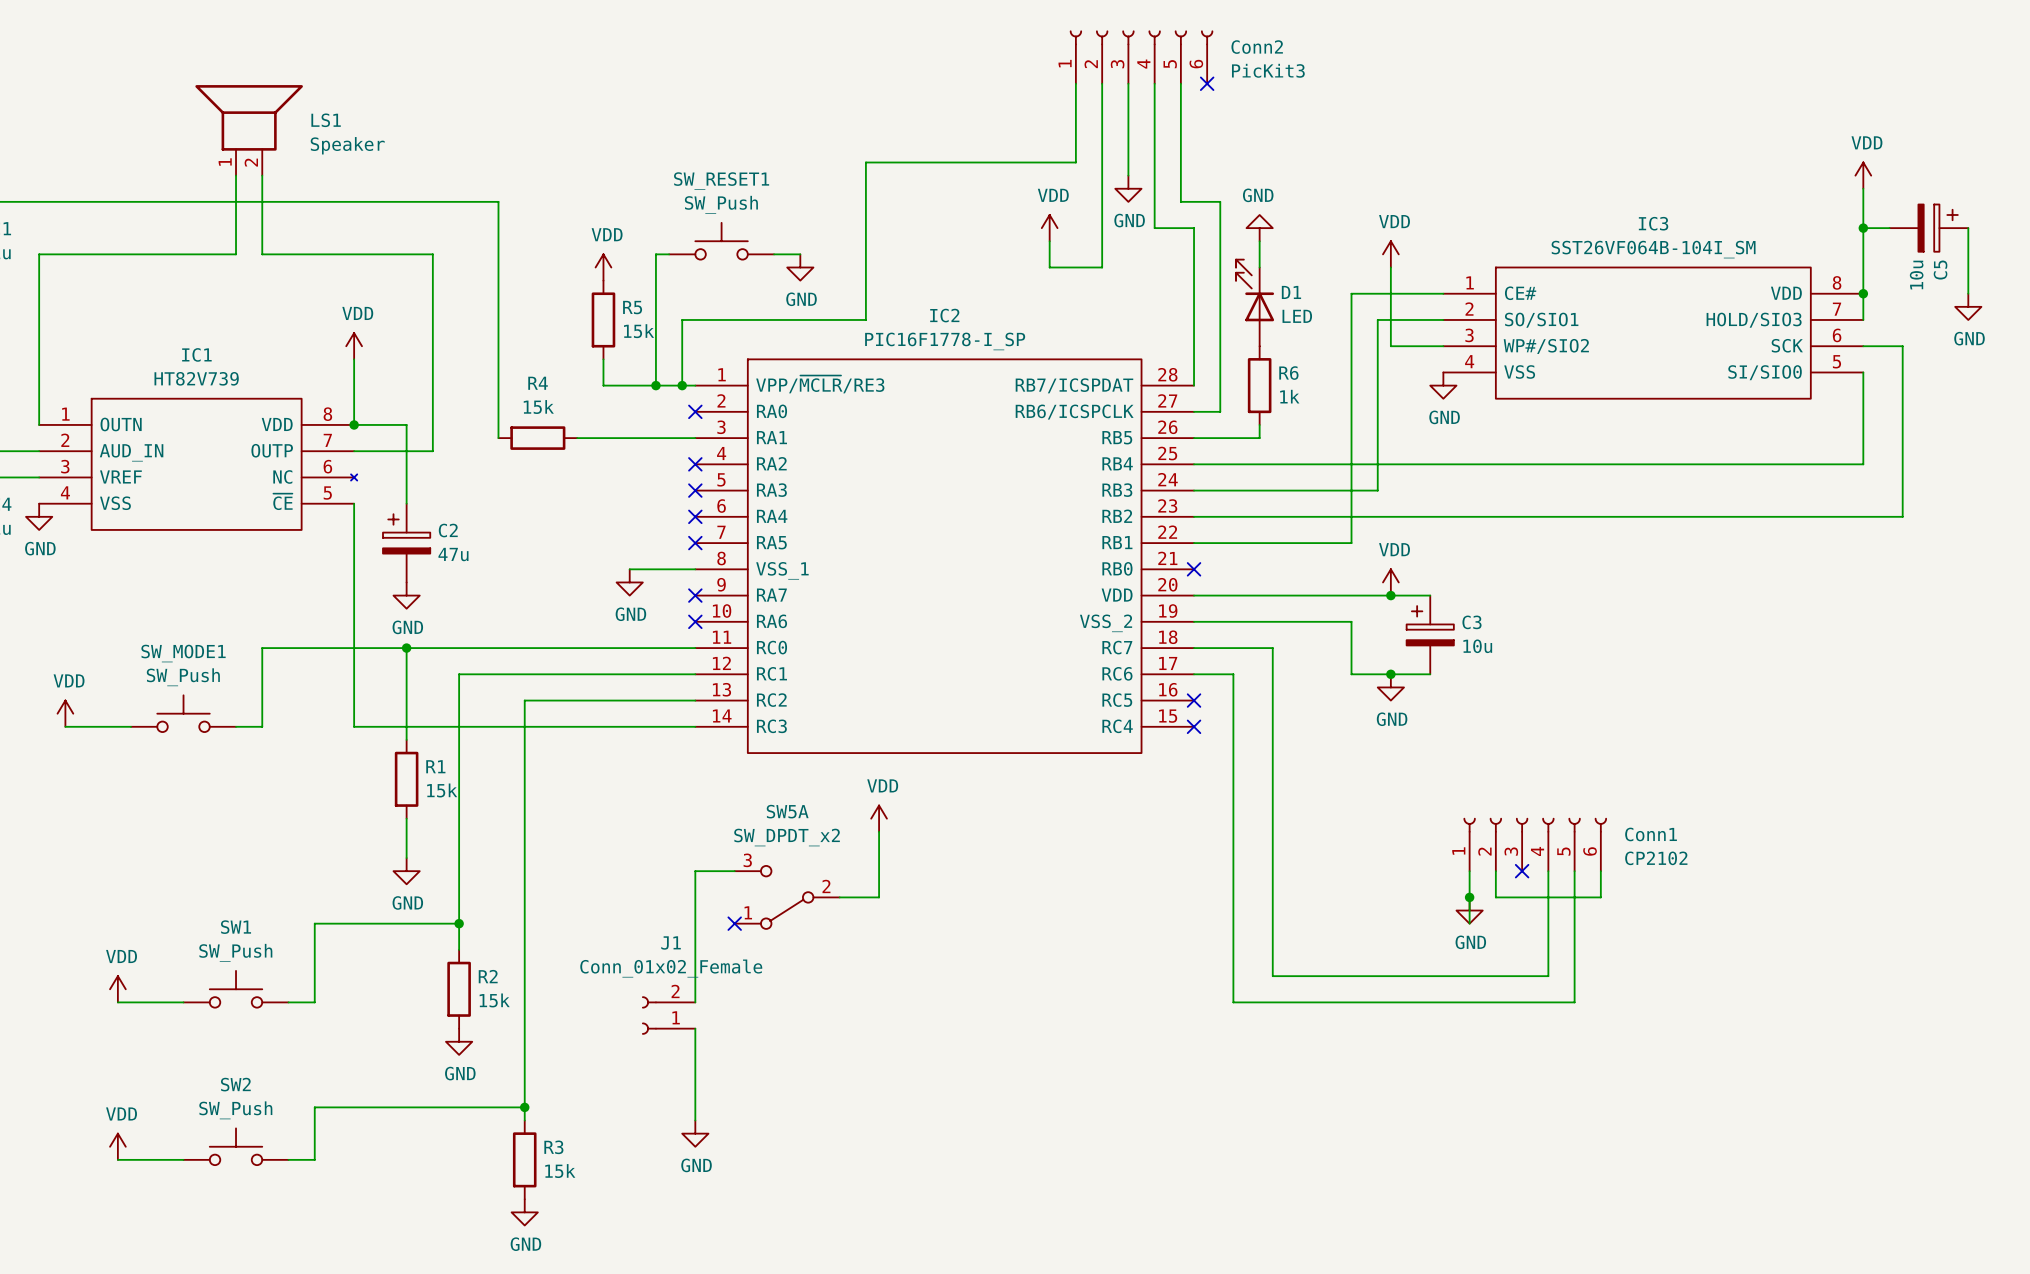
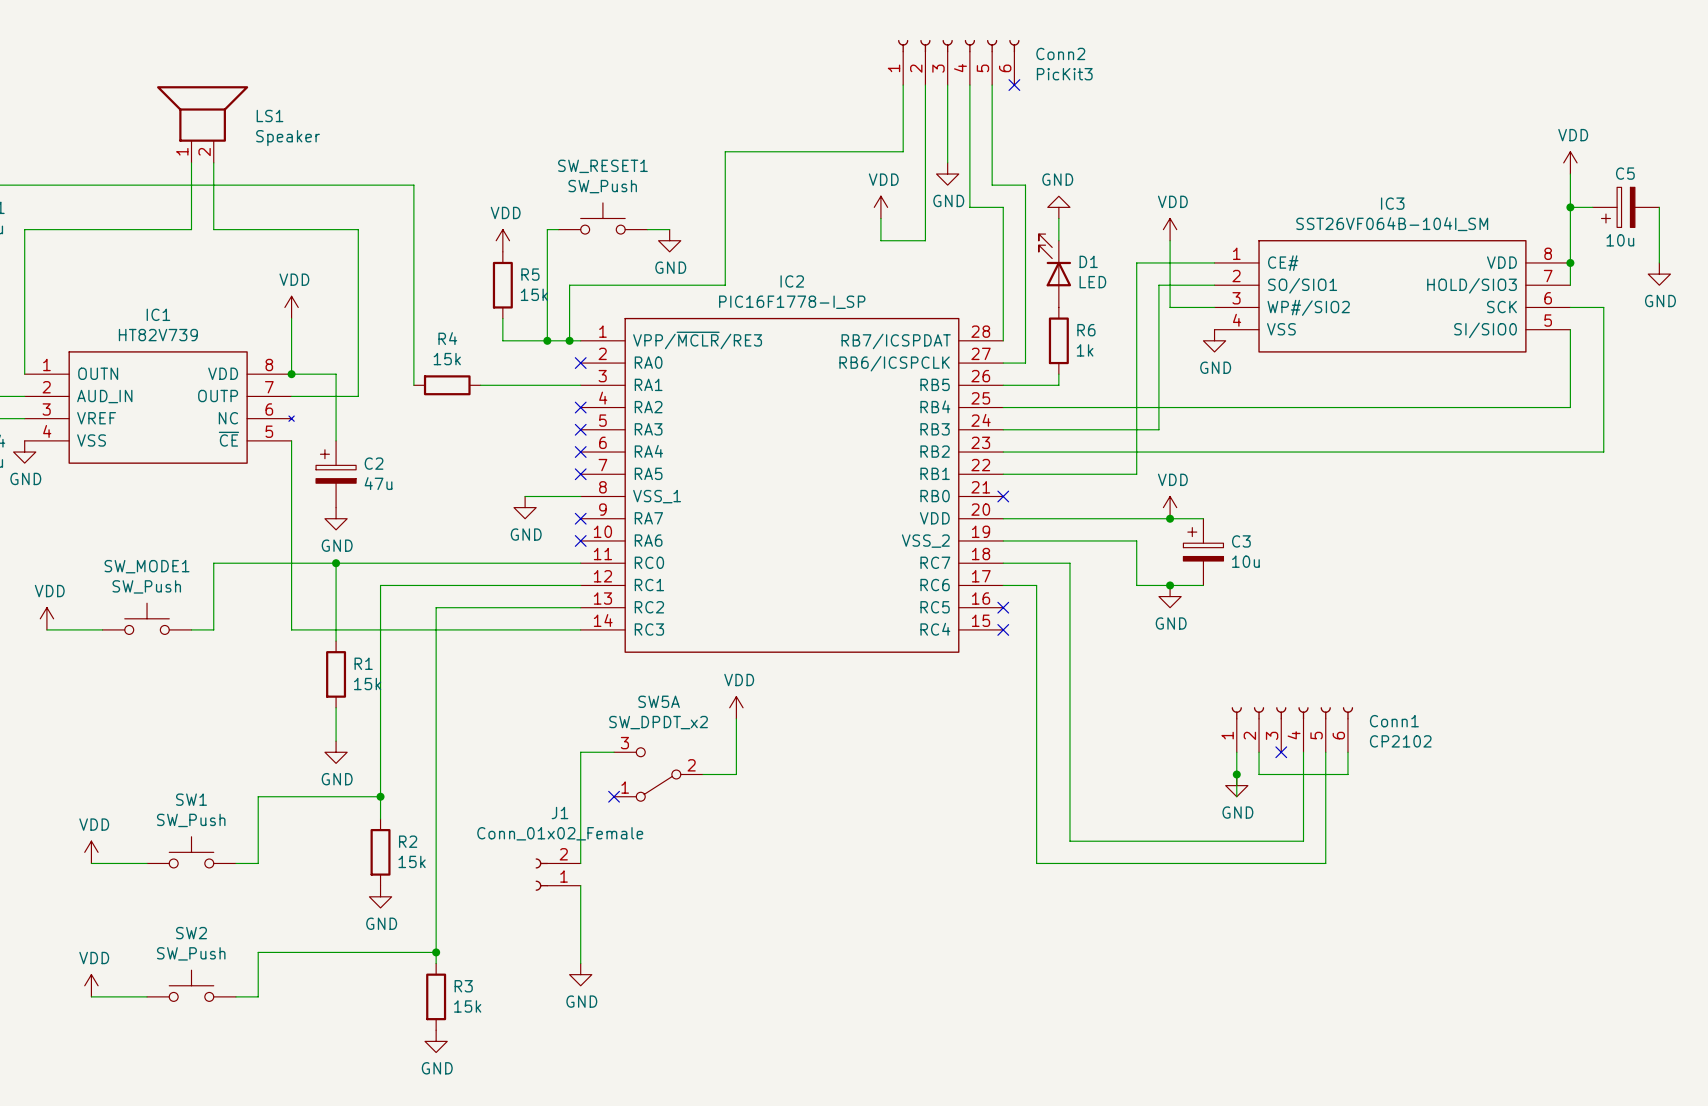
C5 rotation: 0° (1938, 228) -> 180° (1618, 207)

